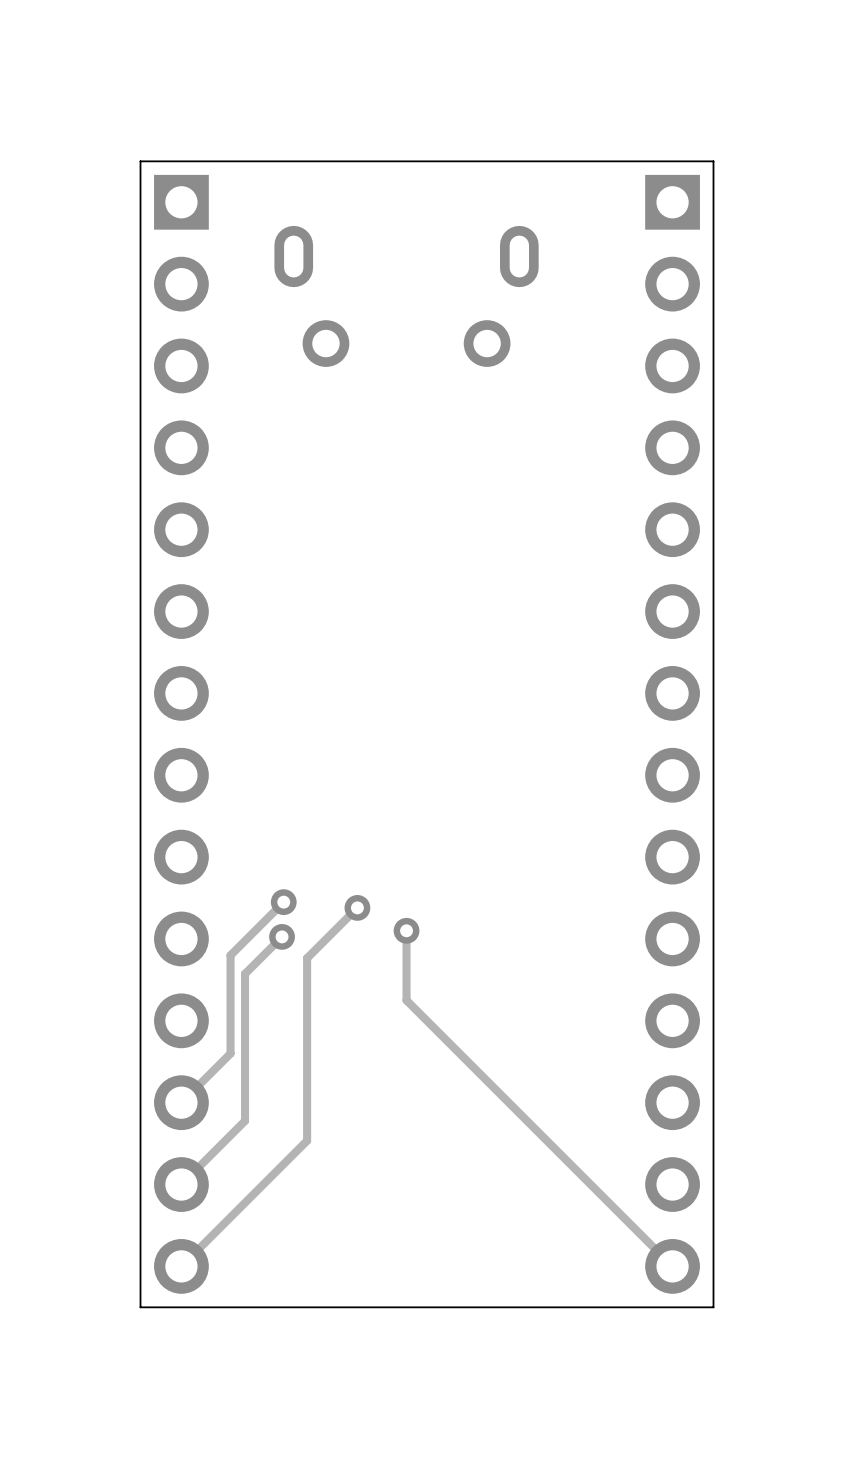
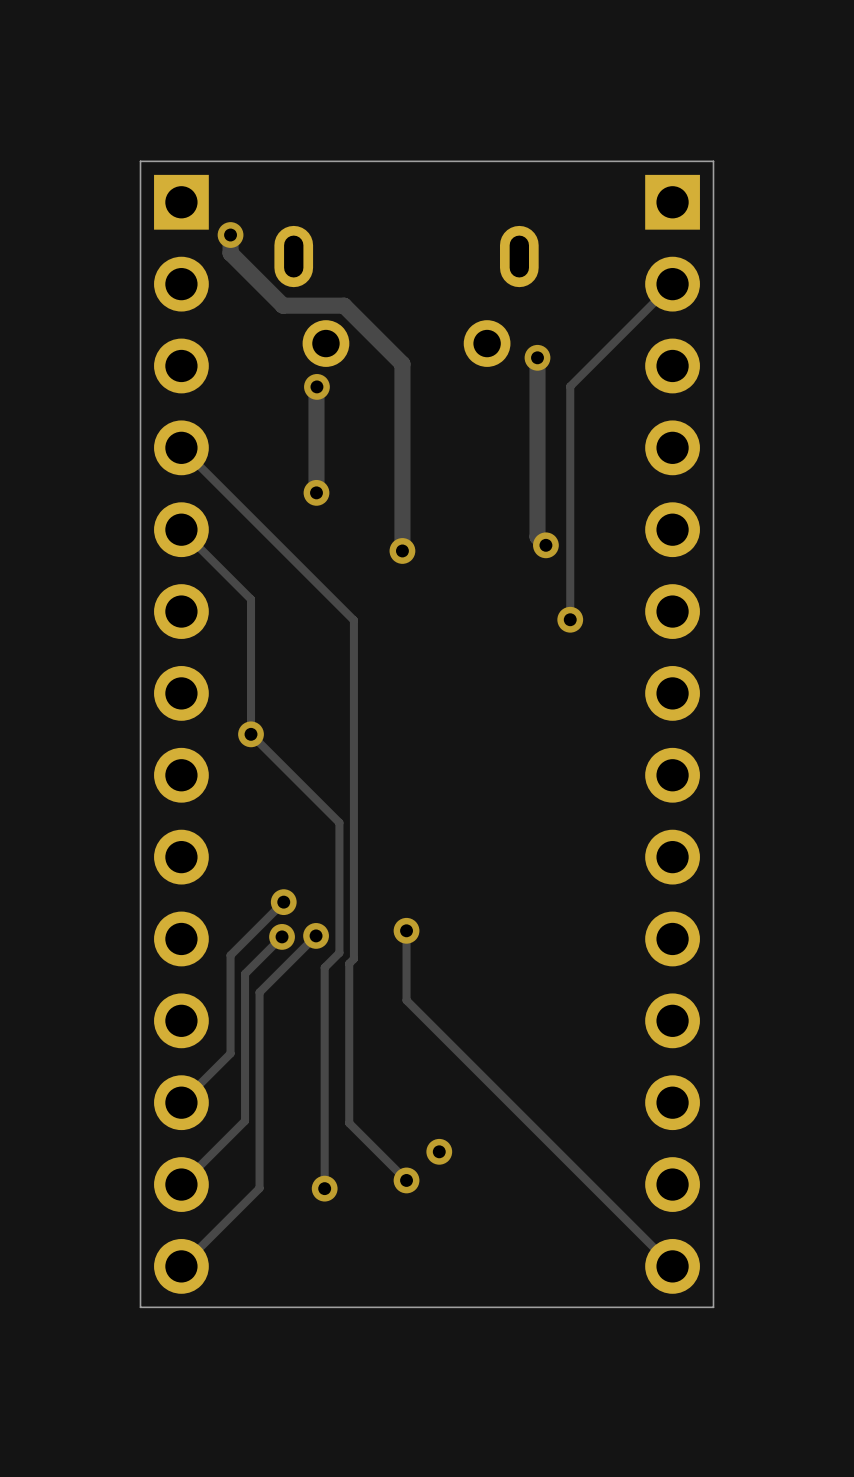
track: none -> (230, 235) (230, 253) (282, 305) (344, 305) (402, 363) (402, 550)
via: none -> (230, 235)
track: none -> (672, 284) (570, 386) (570, 619)
track: none -> (537, 357) (537, 536) (545, 545)
via: none -> (537, 357)
track: none -> (316, 386) (316, 492)
via: none -> (316, 386)
track: none -> (181, 447) (353, 620) (353, 958) (349, 963) (349, 1123) (406, 1180)
via: none -> (316, 492)
track: none -> (181, 529) (251, 599) (251, 734) (339, 822) (339, 952) (324, 967) (324, 1188)
via: none -> (545, 545)
via: none -> (402, 550)
via: none -> (570, 619)
via: none -> (251, 734)
track: (357, 907) (307, 958) (307, 1140) (259, 1188) -> (316, 935) (259, 992) (259, 1188)
via position: (357, 907) -> (316, 935)
via: none -> (439, 1151)
via: none -> (406, 1180)
via: none -> (324, 1188)

